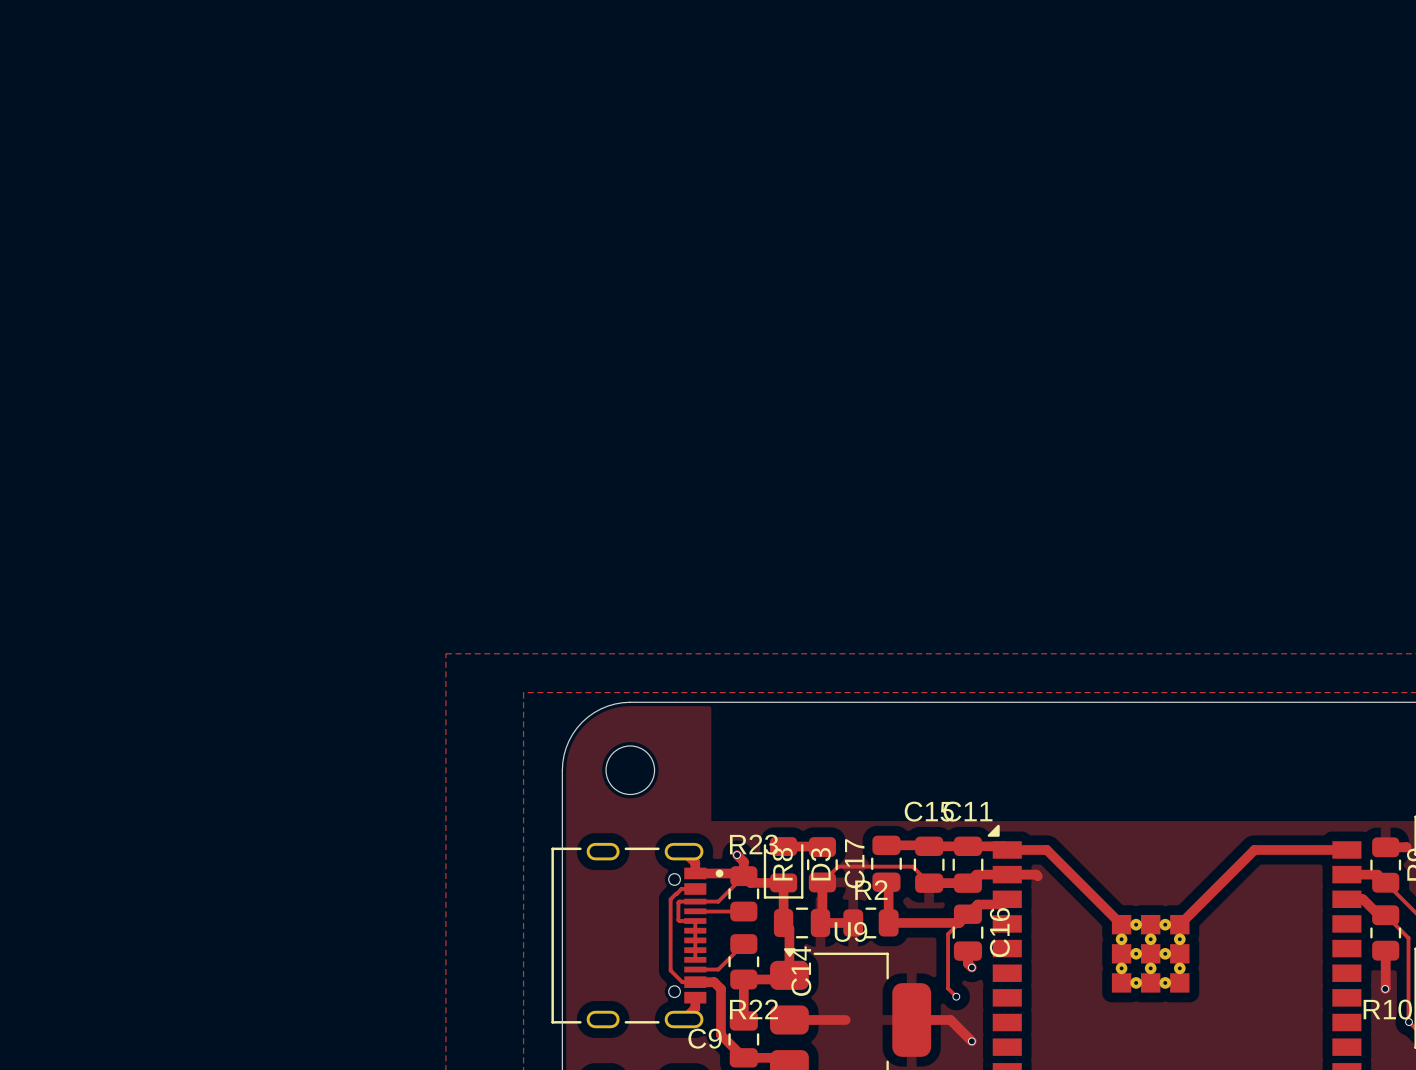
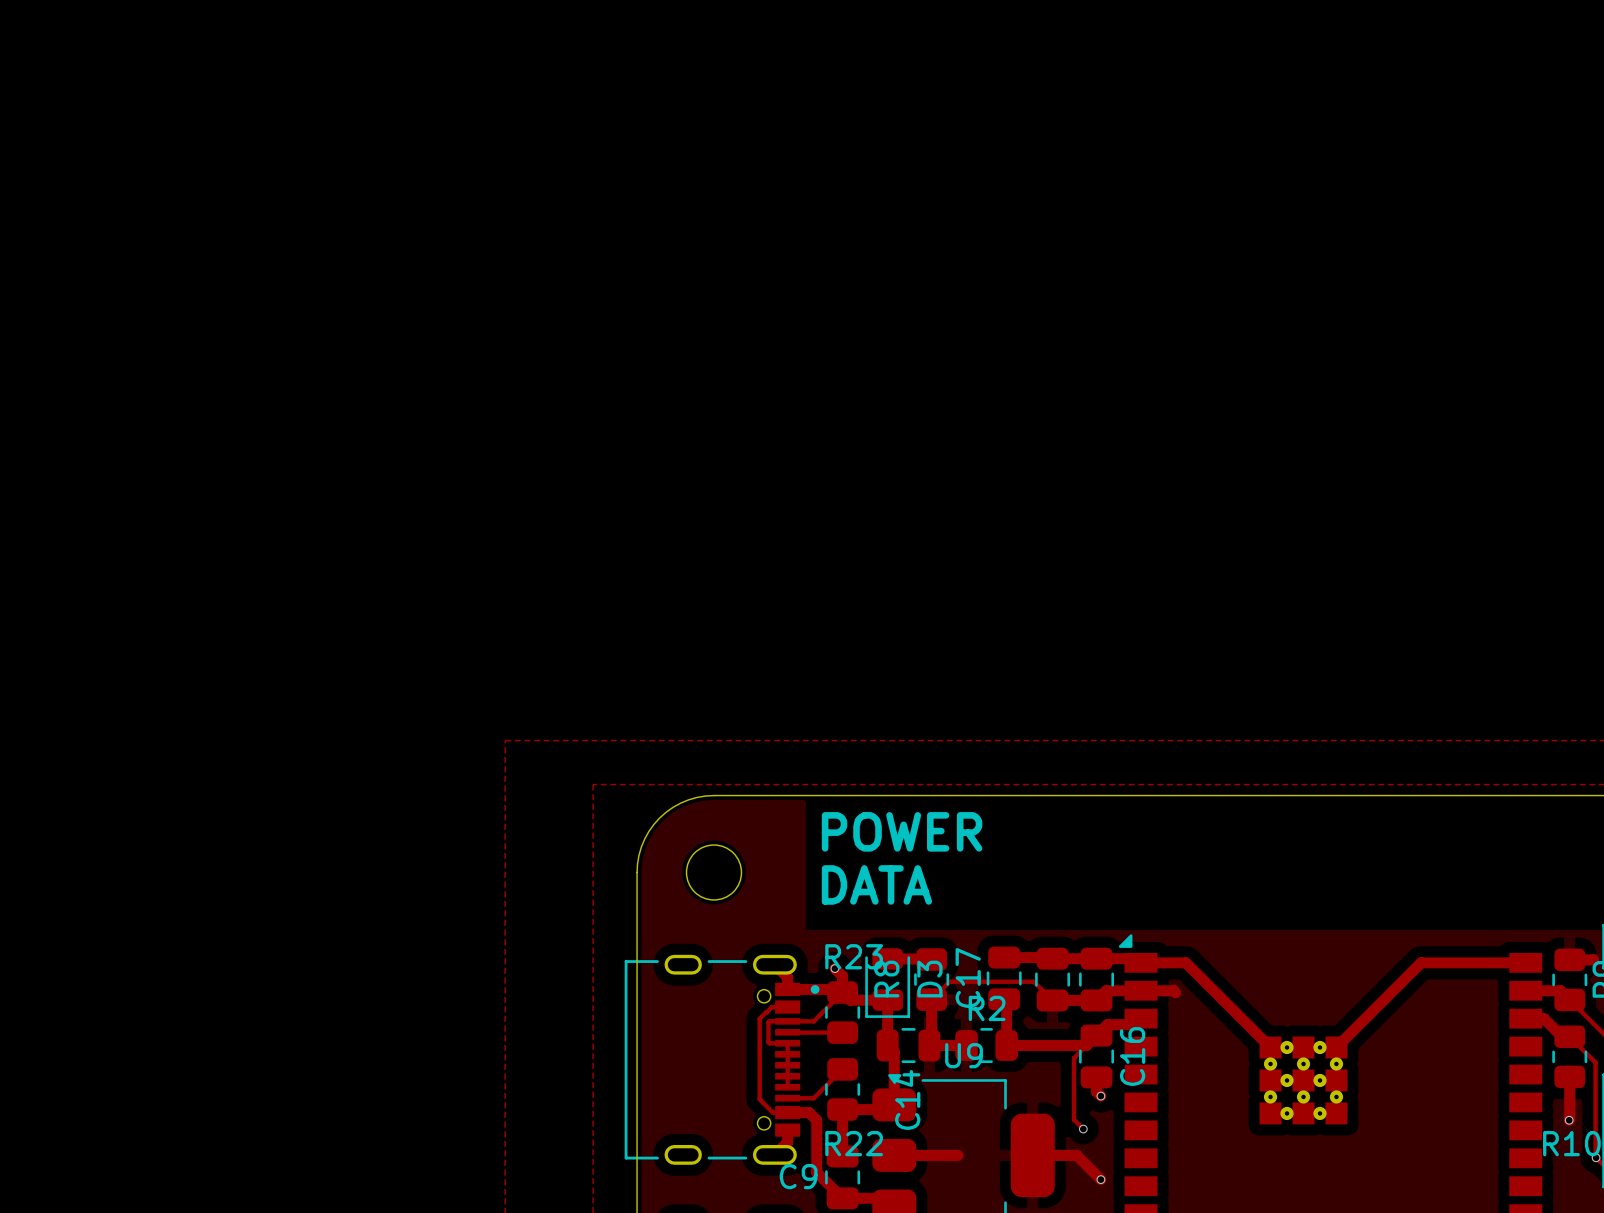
text: none -> POWER (902, 831)
text: none -> DATA (876, 884)
C15 name: C15 (929, 811) -> none
C11 name: C11 (968, 811) -> none

